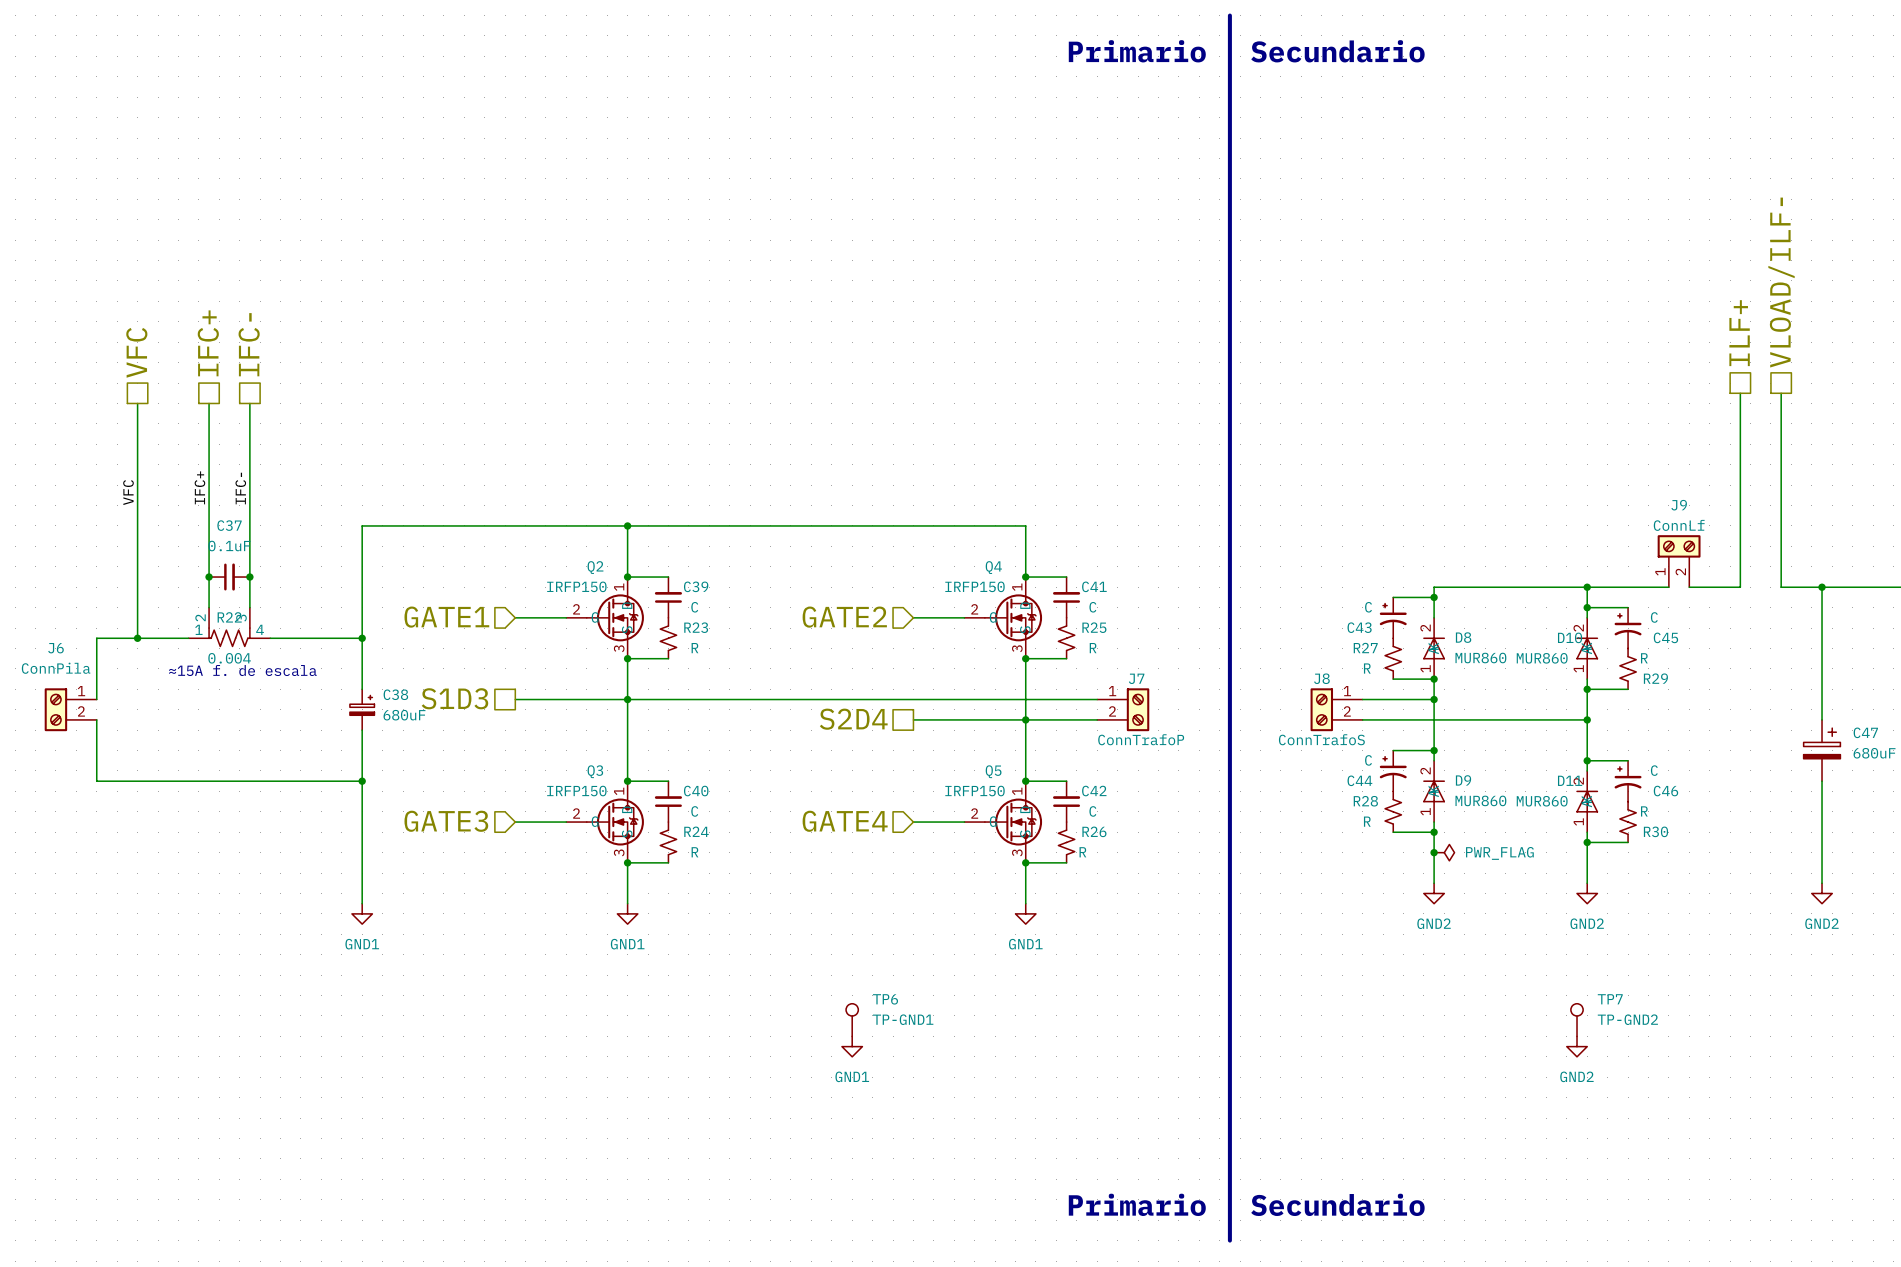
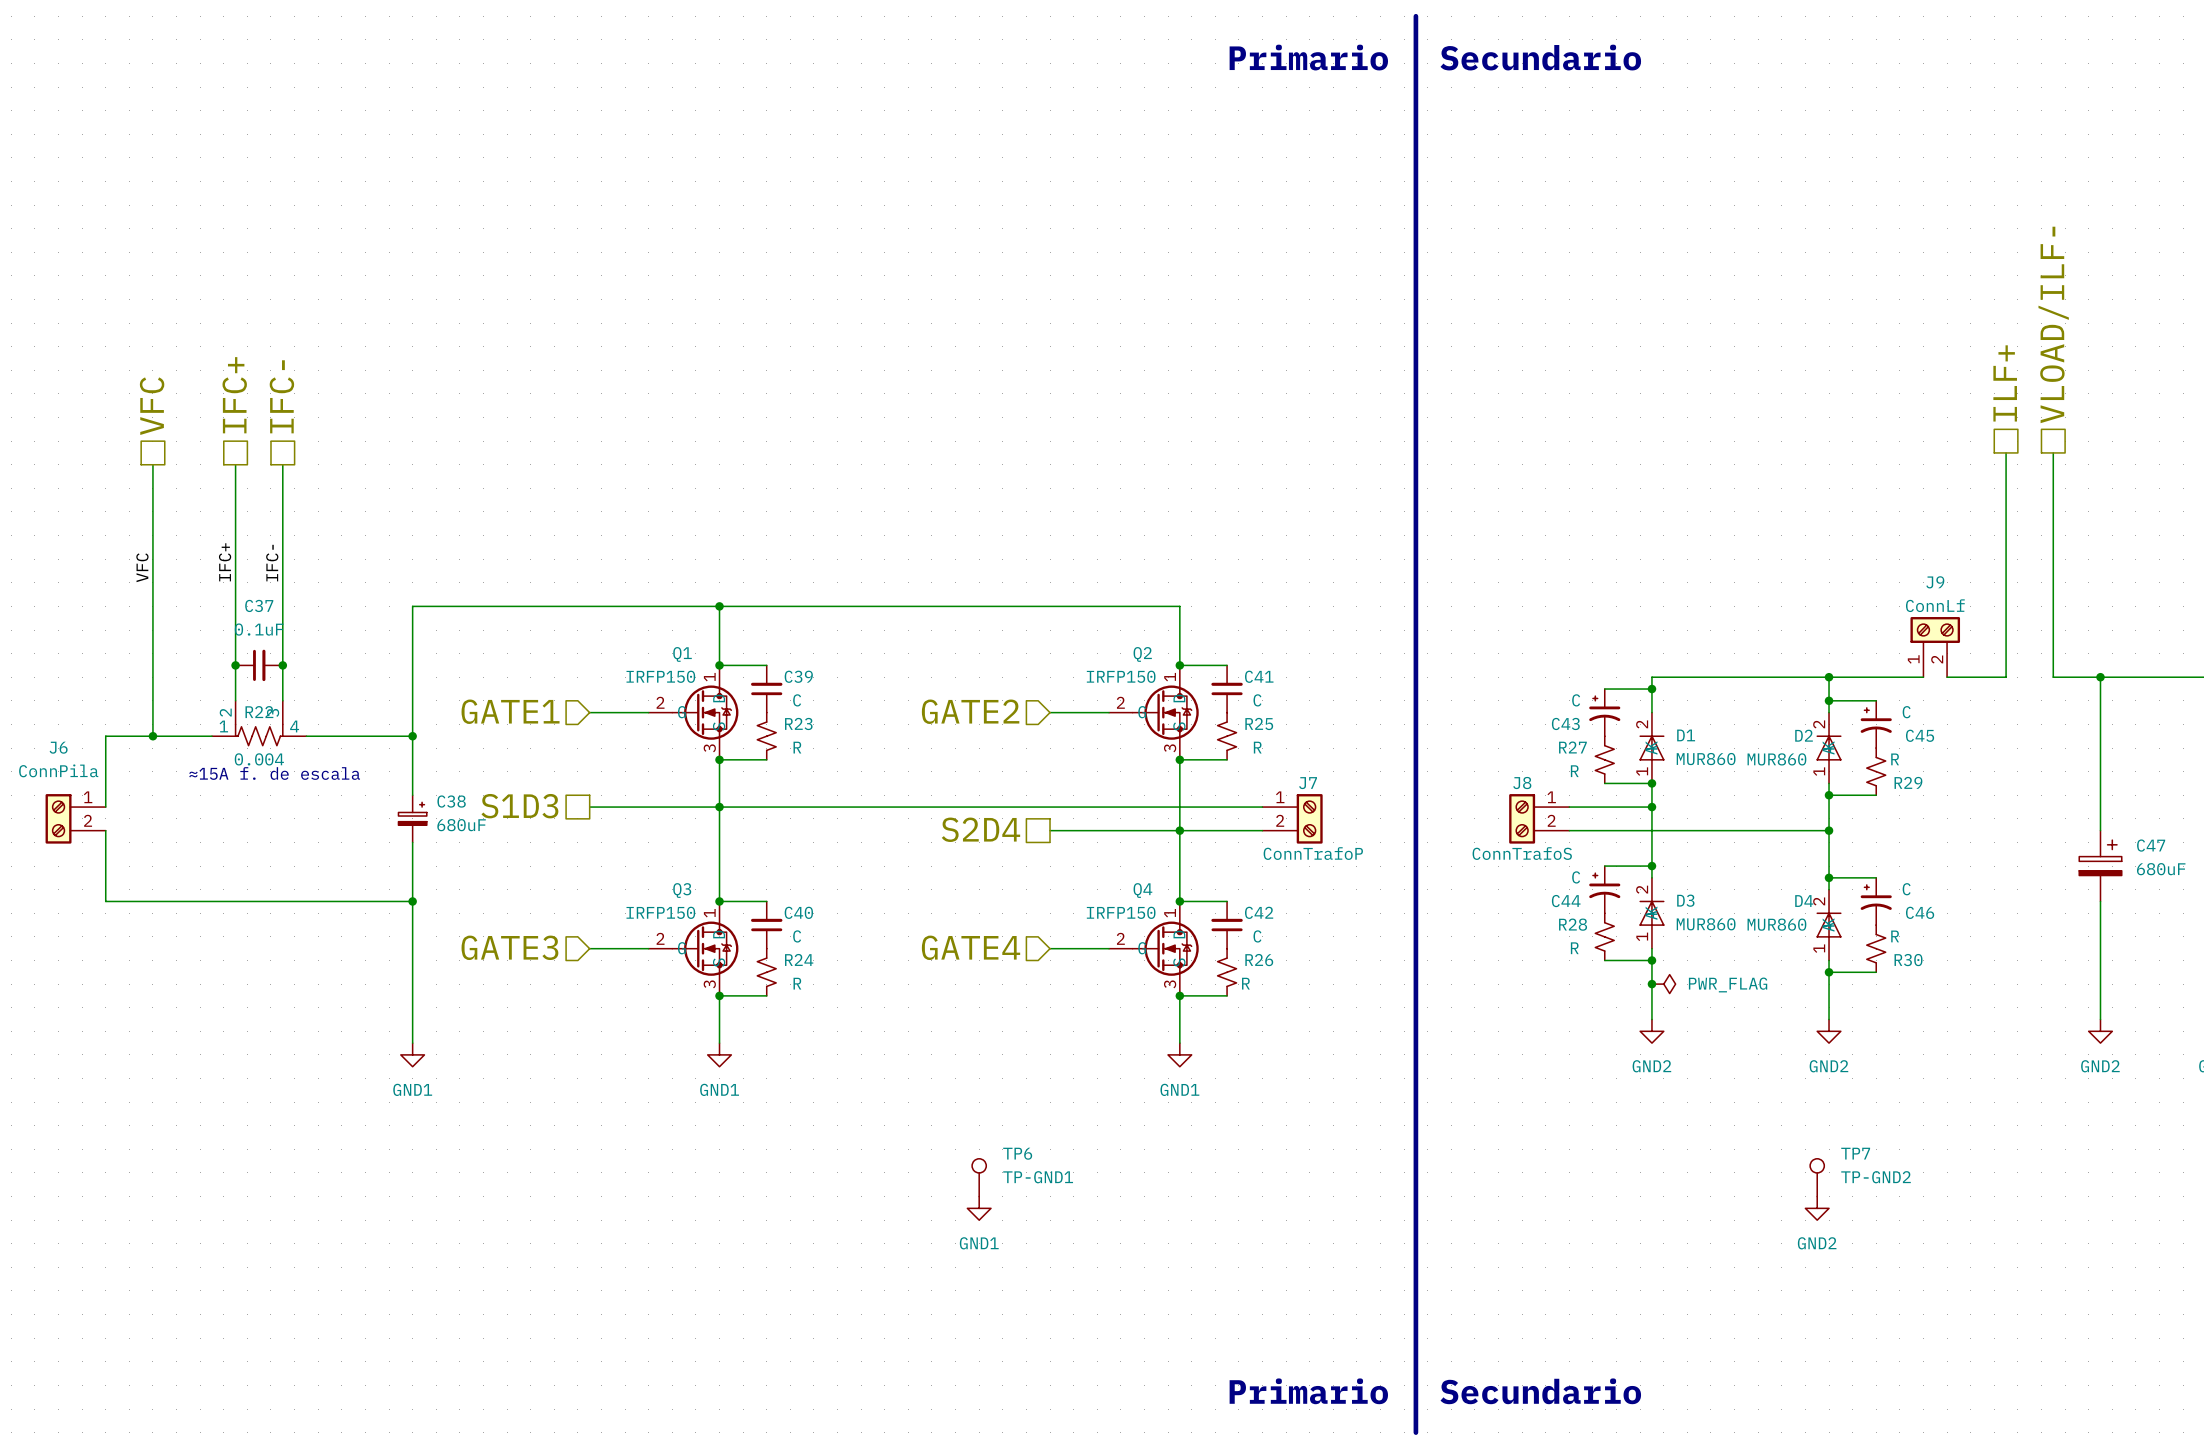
Q2 name: Q2 (595, 567) -> Q1 (682, 654)
Q4 name: Q4 (993, 567) -> Q2 (1142, 654)
D8 name: D8 (1463, 637) -> D1 (1686, 735)
D10 name: D10 (1570, 637) -> D2 (1804, 735)
Q5 name: Q5 (993, 771) -> Q4 (1142, 890)
D9 name: D9 (1463, 780) -> D3 (1685, 900)
D11 name: D11 (1570, 780) -> D4 (1804, 901)

